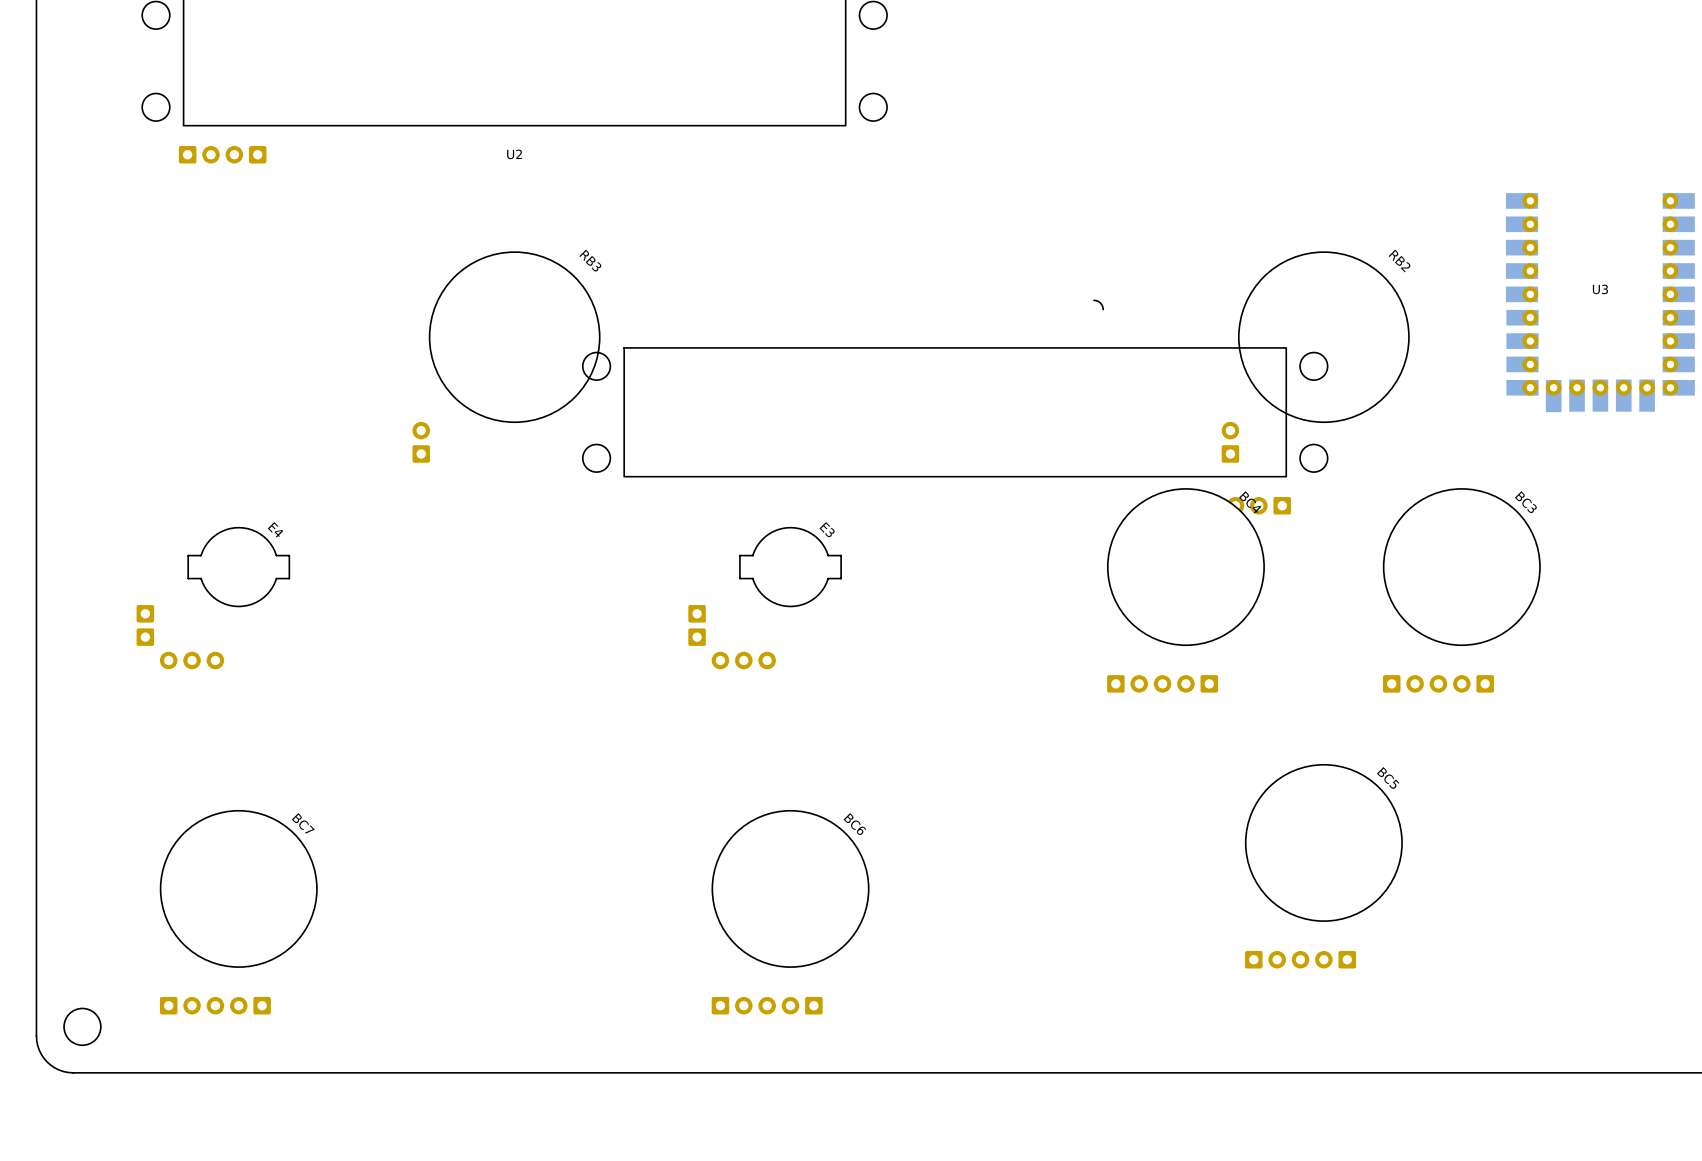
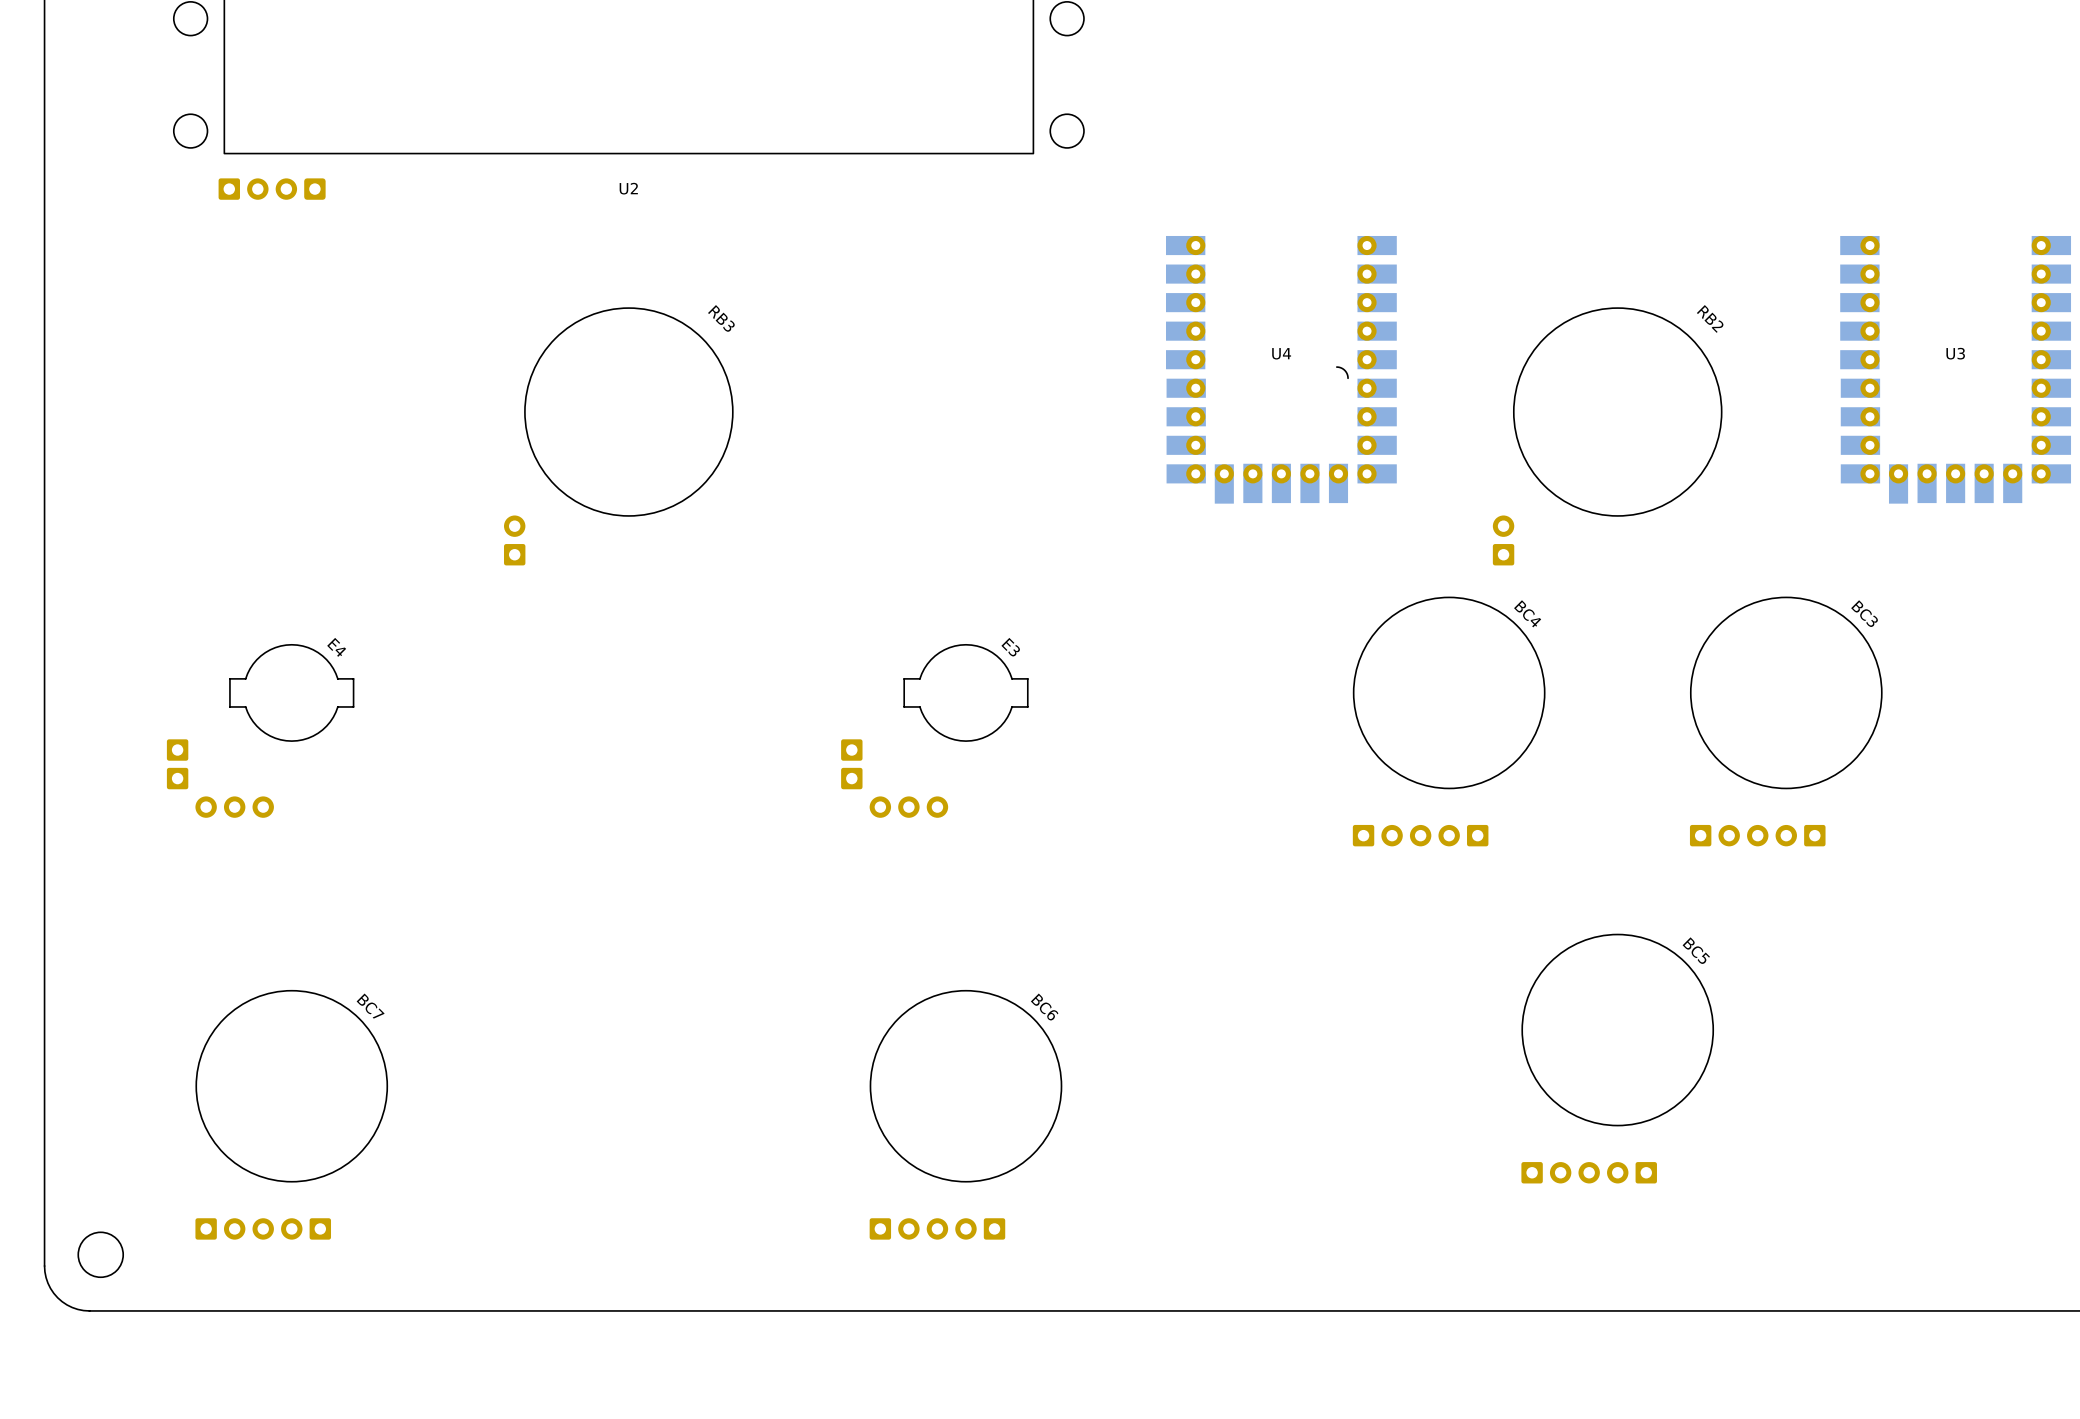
U4: none -> (1281, 369)
part: (955, 431) -> none

